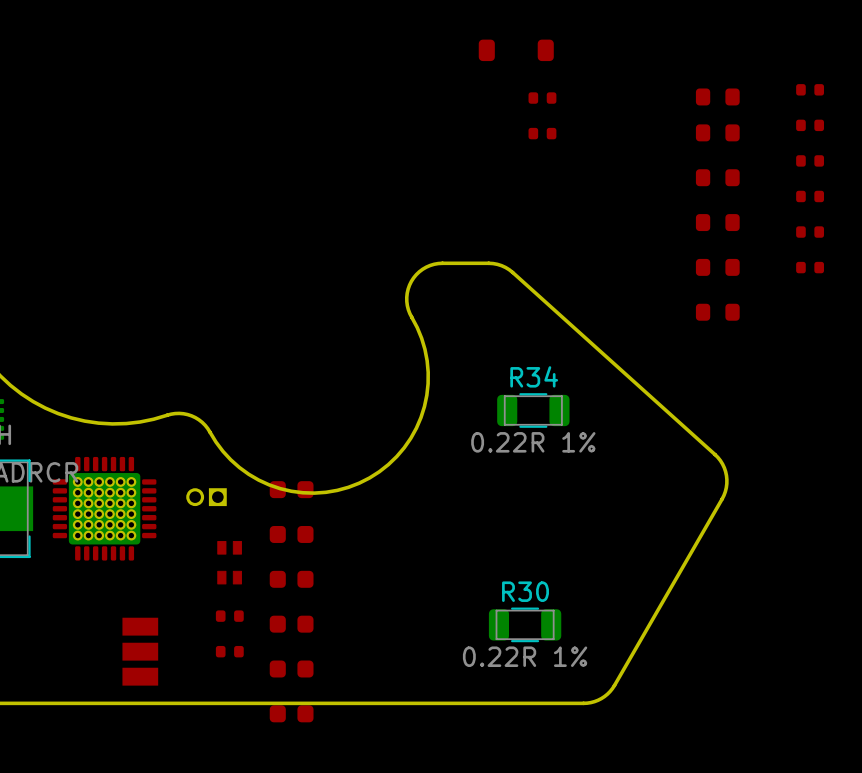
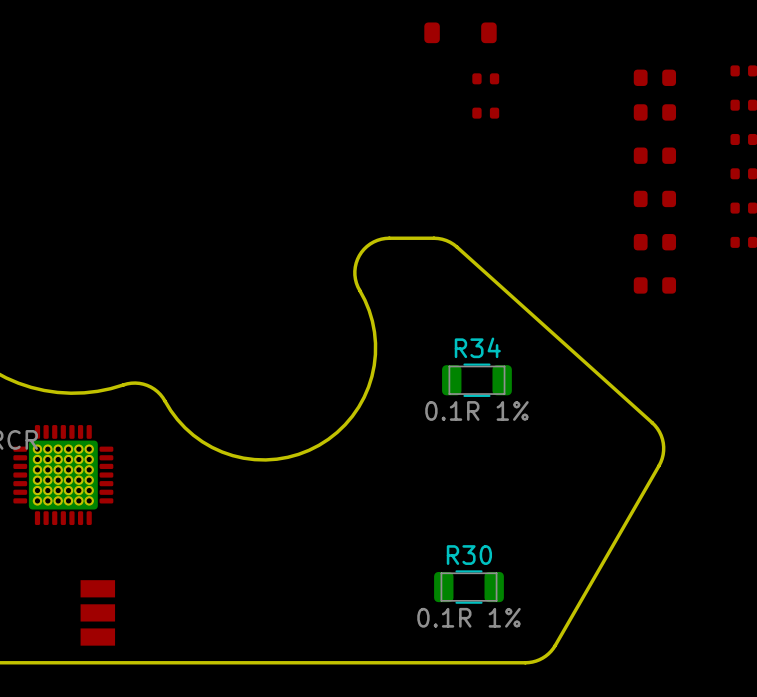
R34 value: 0.22R 1% (533, 442) -> 0.1R 1% (476, 410)
part: (291, 489) -> none
part: (206, 497) -> none
part: (291, 534) -> none
part: (229, 562) -> none
part: (291, 579) -> none
part: (229, 616) -> none
part: (291, 624) -> none
part: (229, 651) -> none
R30 value: 0.22R 1% (525, 656) -> 0.1R 1% (468, 617)
part: (291, 669) -> none
part: (291, 713) -> none

